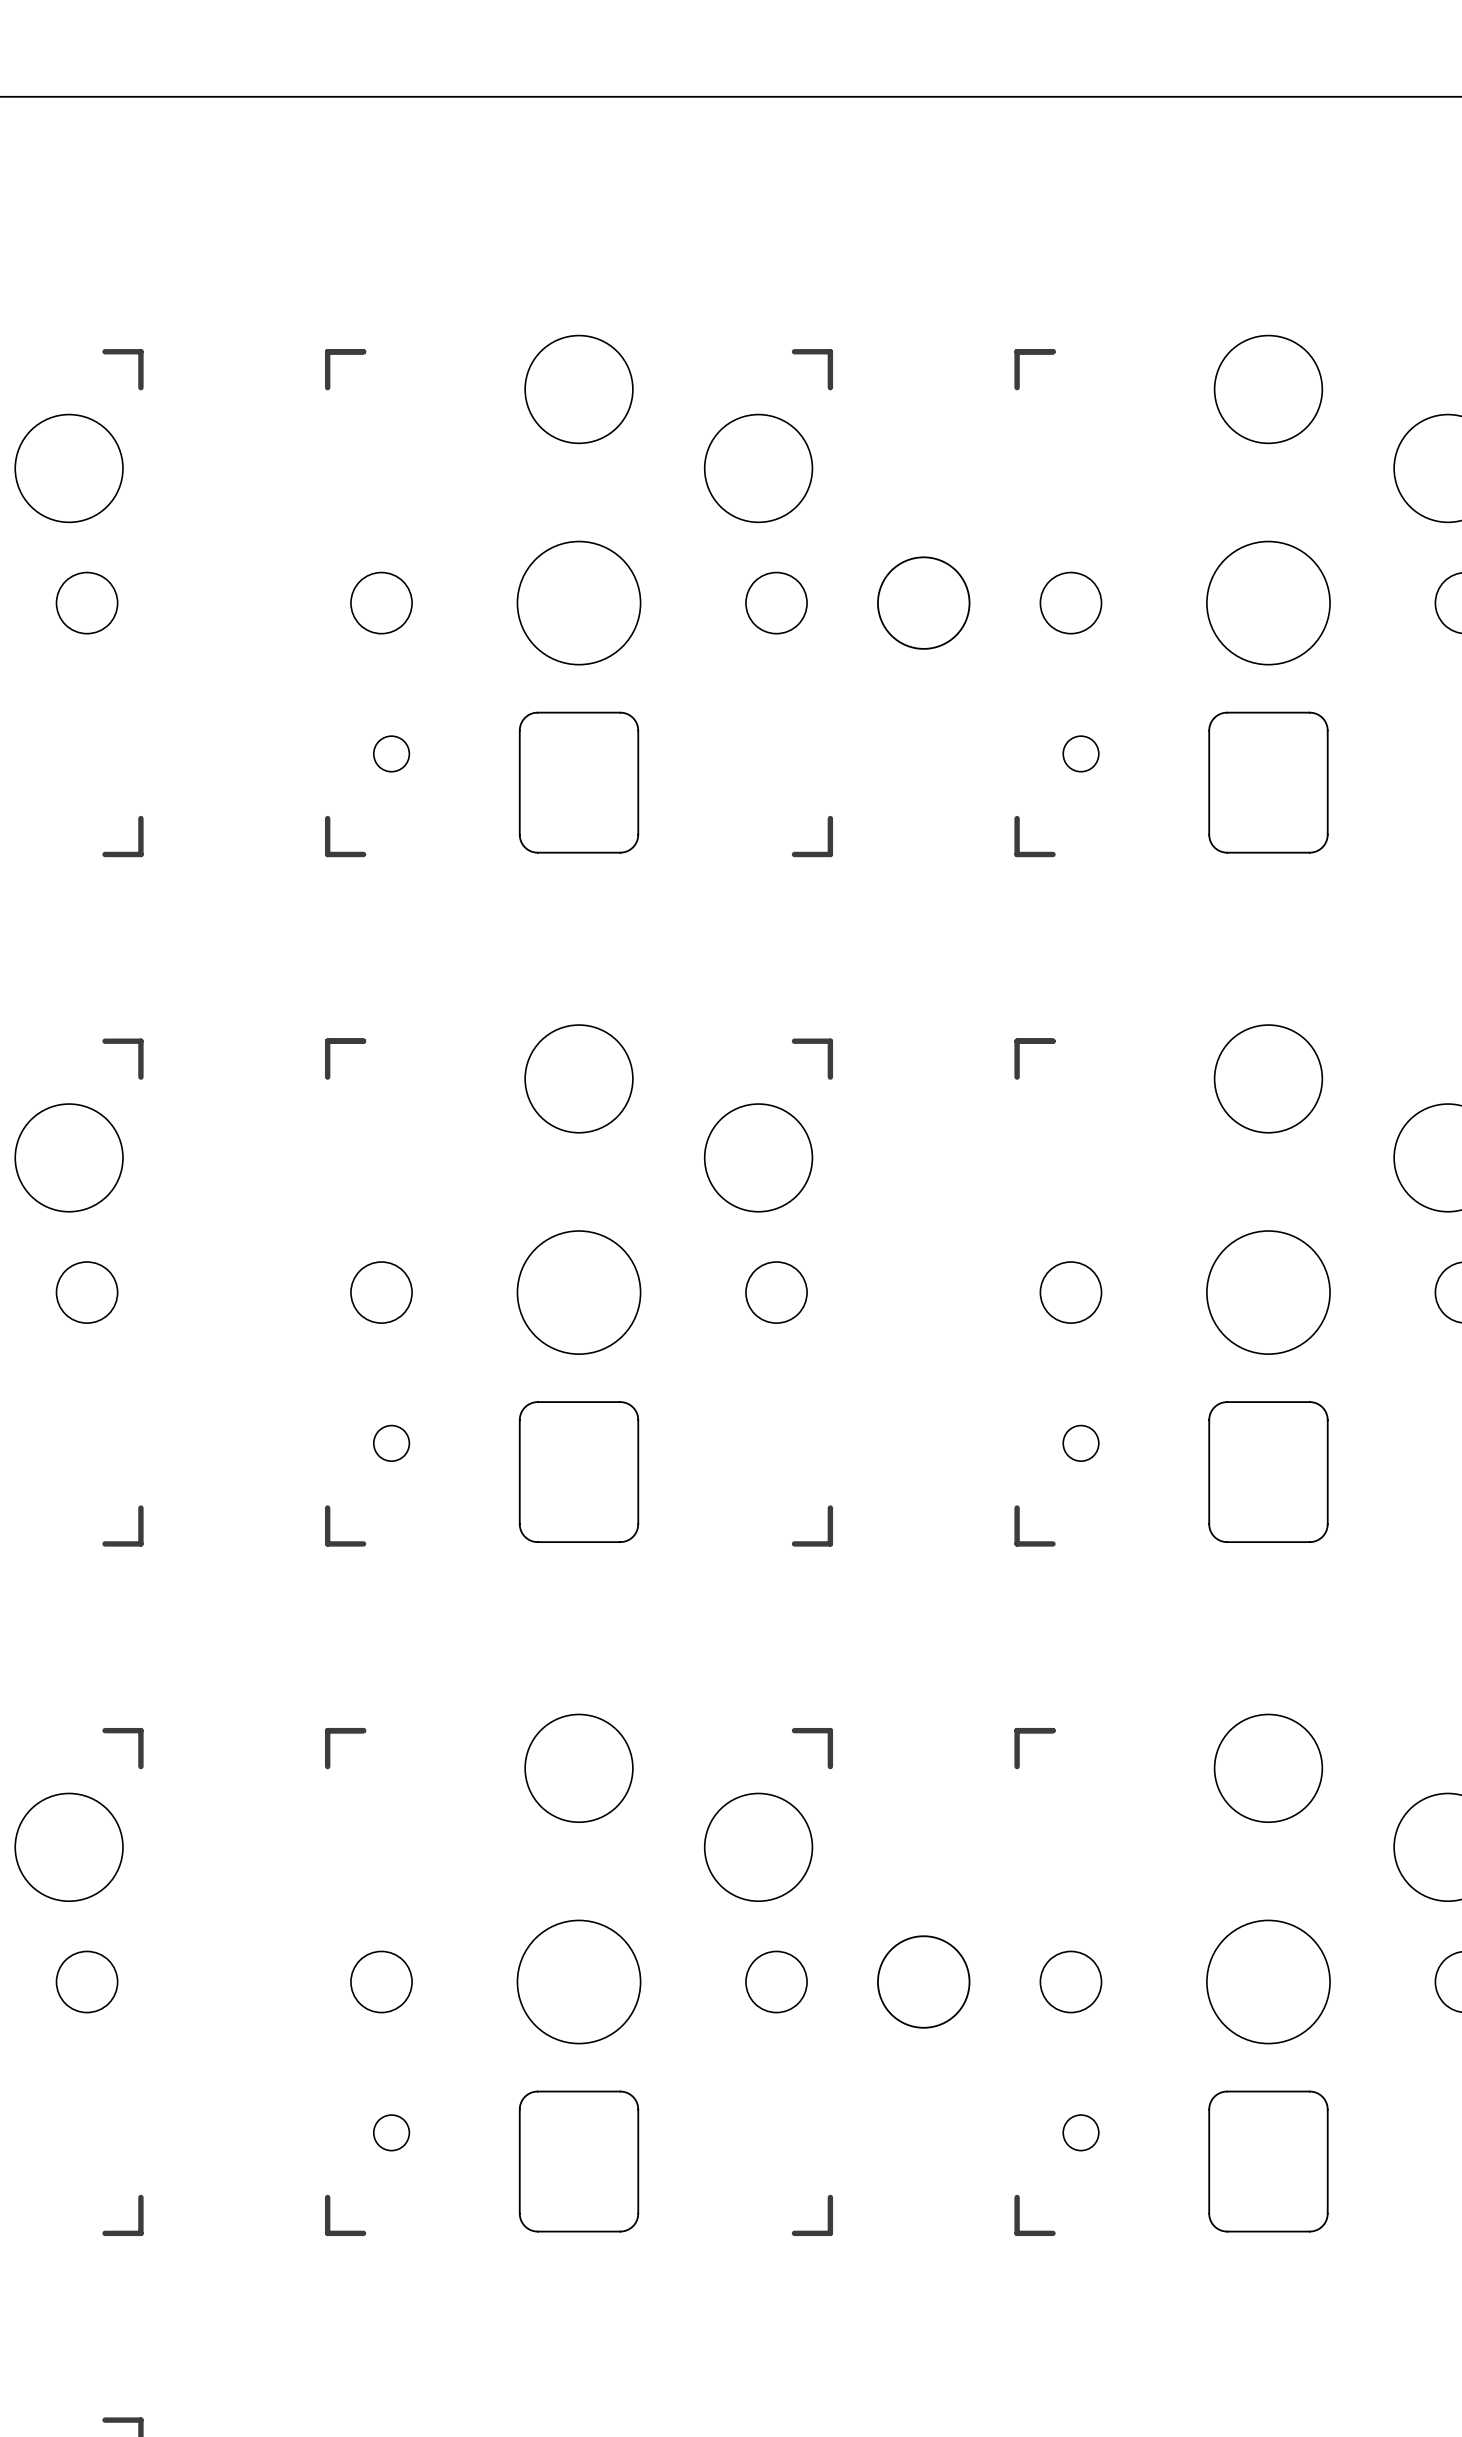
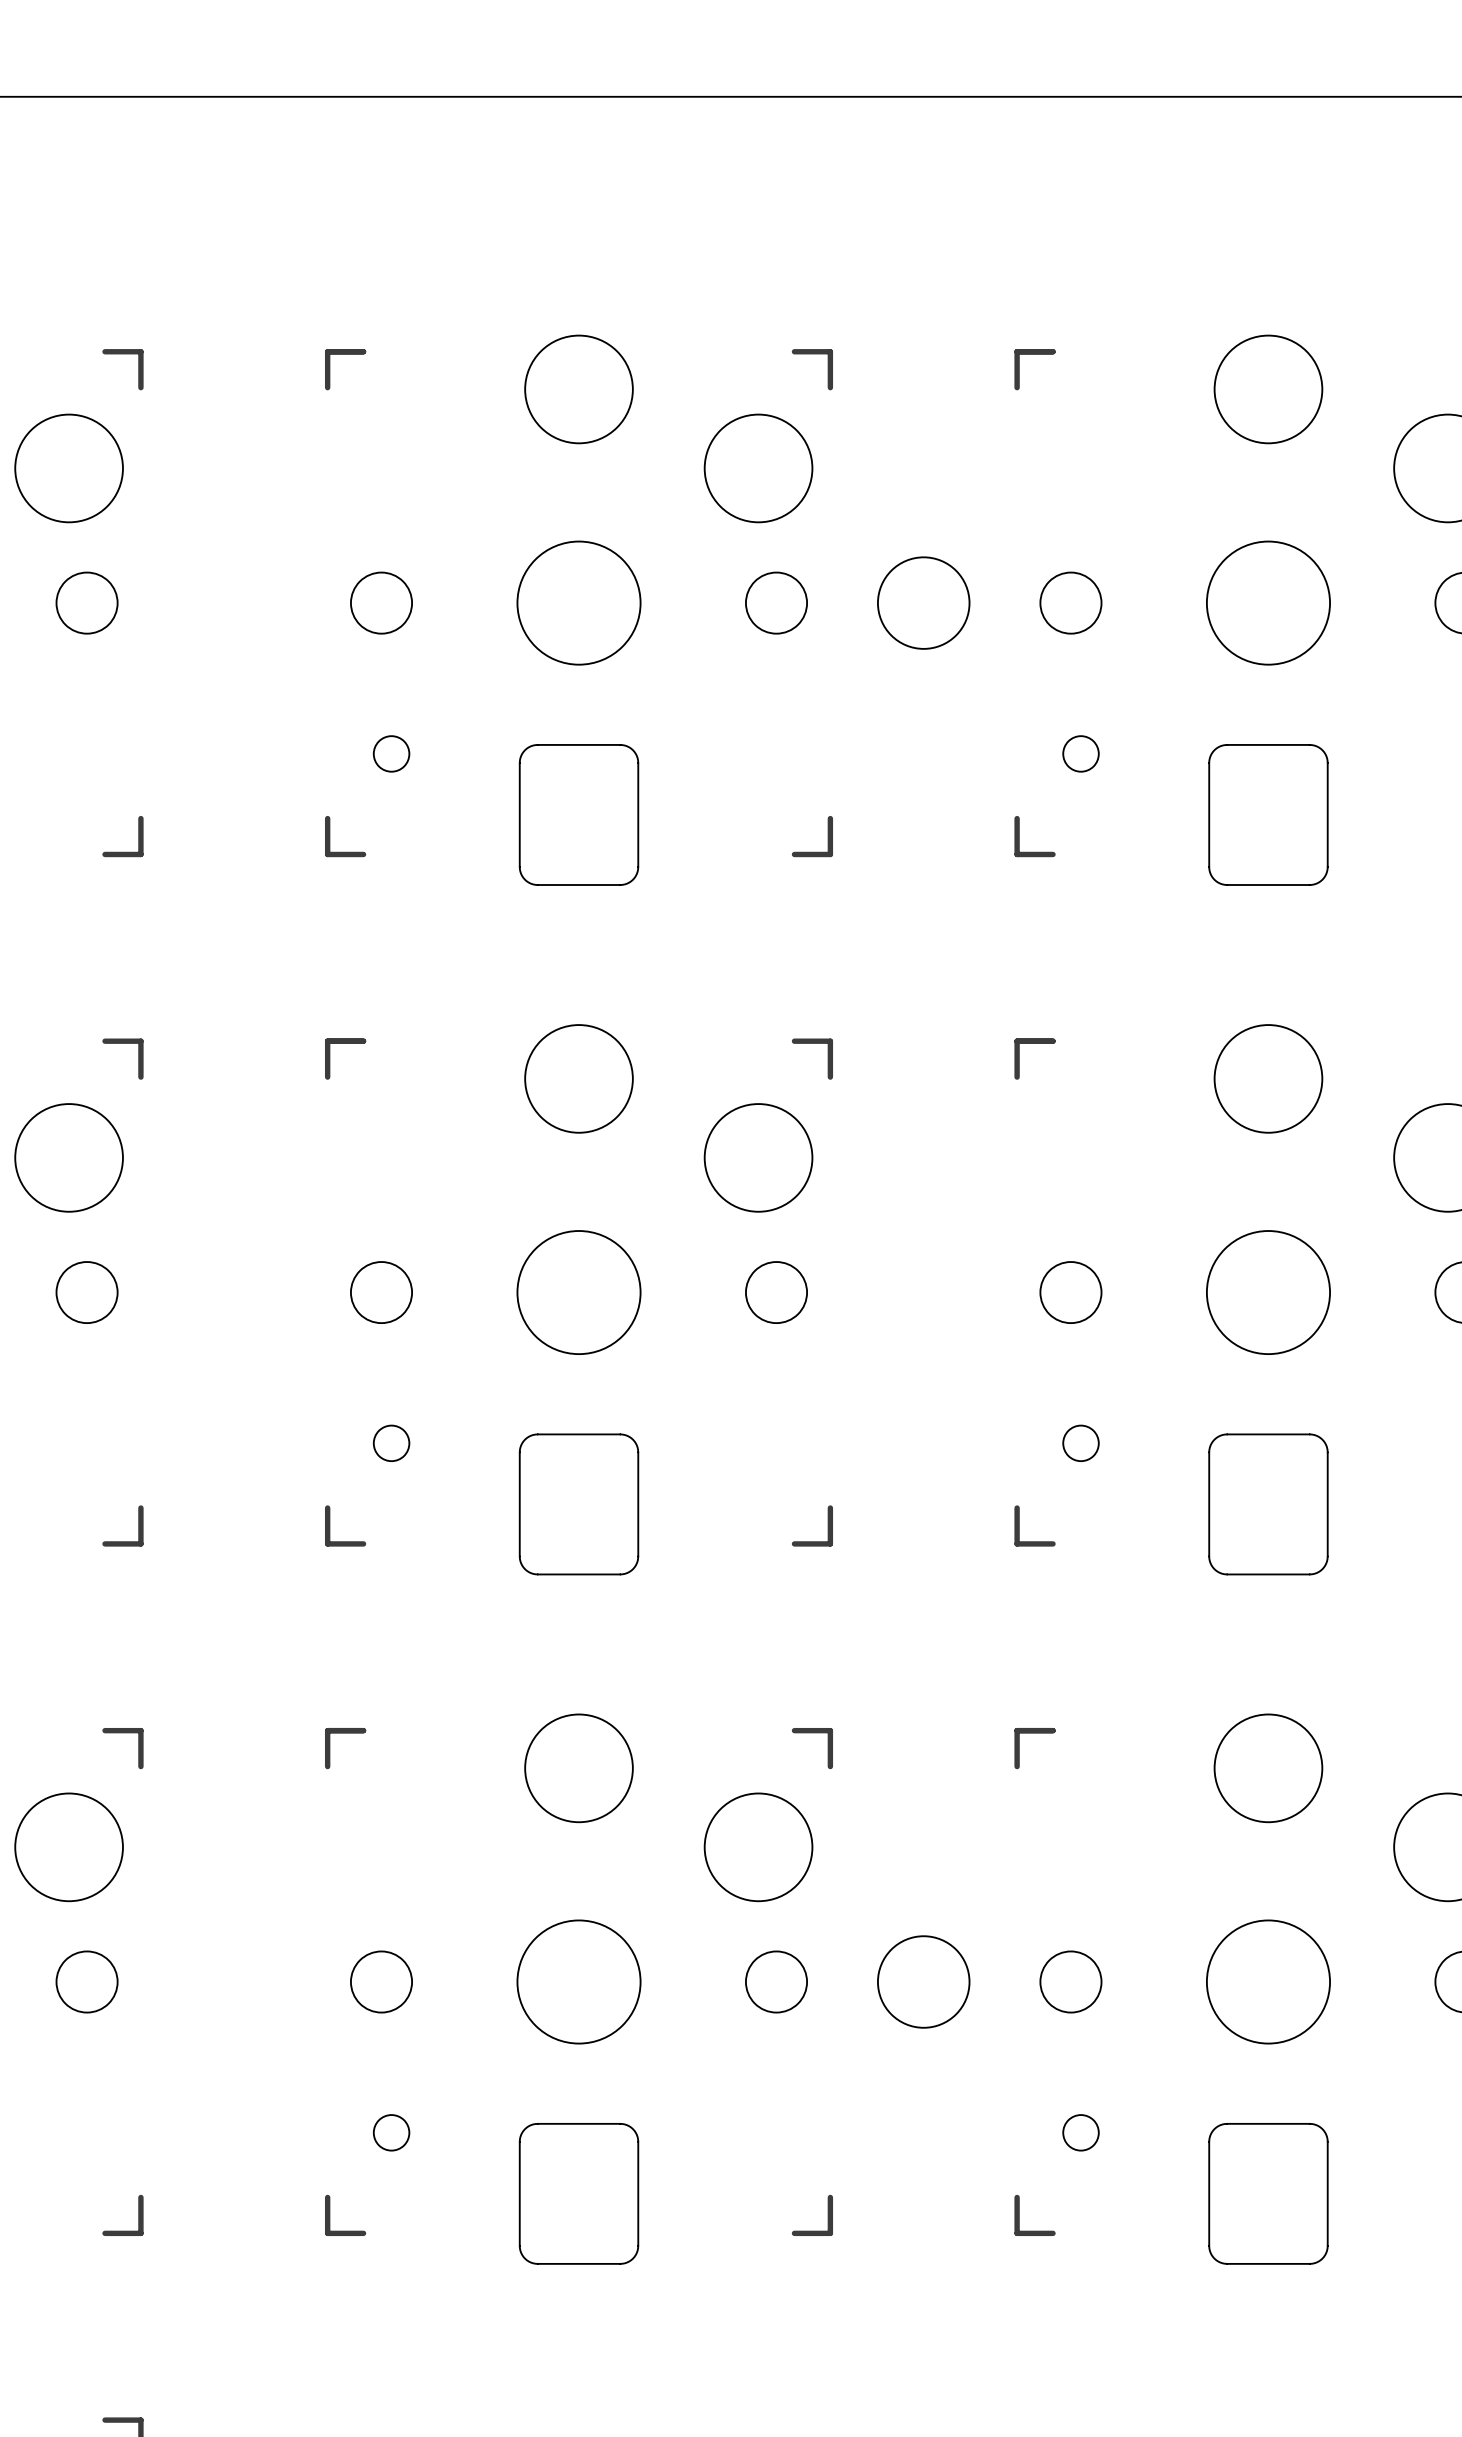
part position: (579, 782) -> (579, 814)
part position: (1268, 782) -> (1268, 814)
part position: (579, 1472) -> (579, 1504)
part position: (1268, 1472) -> (1268, 1504)
part position: (579, 2161) -> (579, 2193)
part position: (1268, 2161) -> (1268, 2193)

